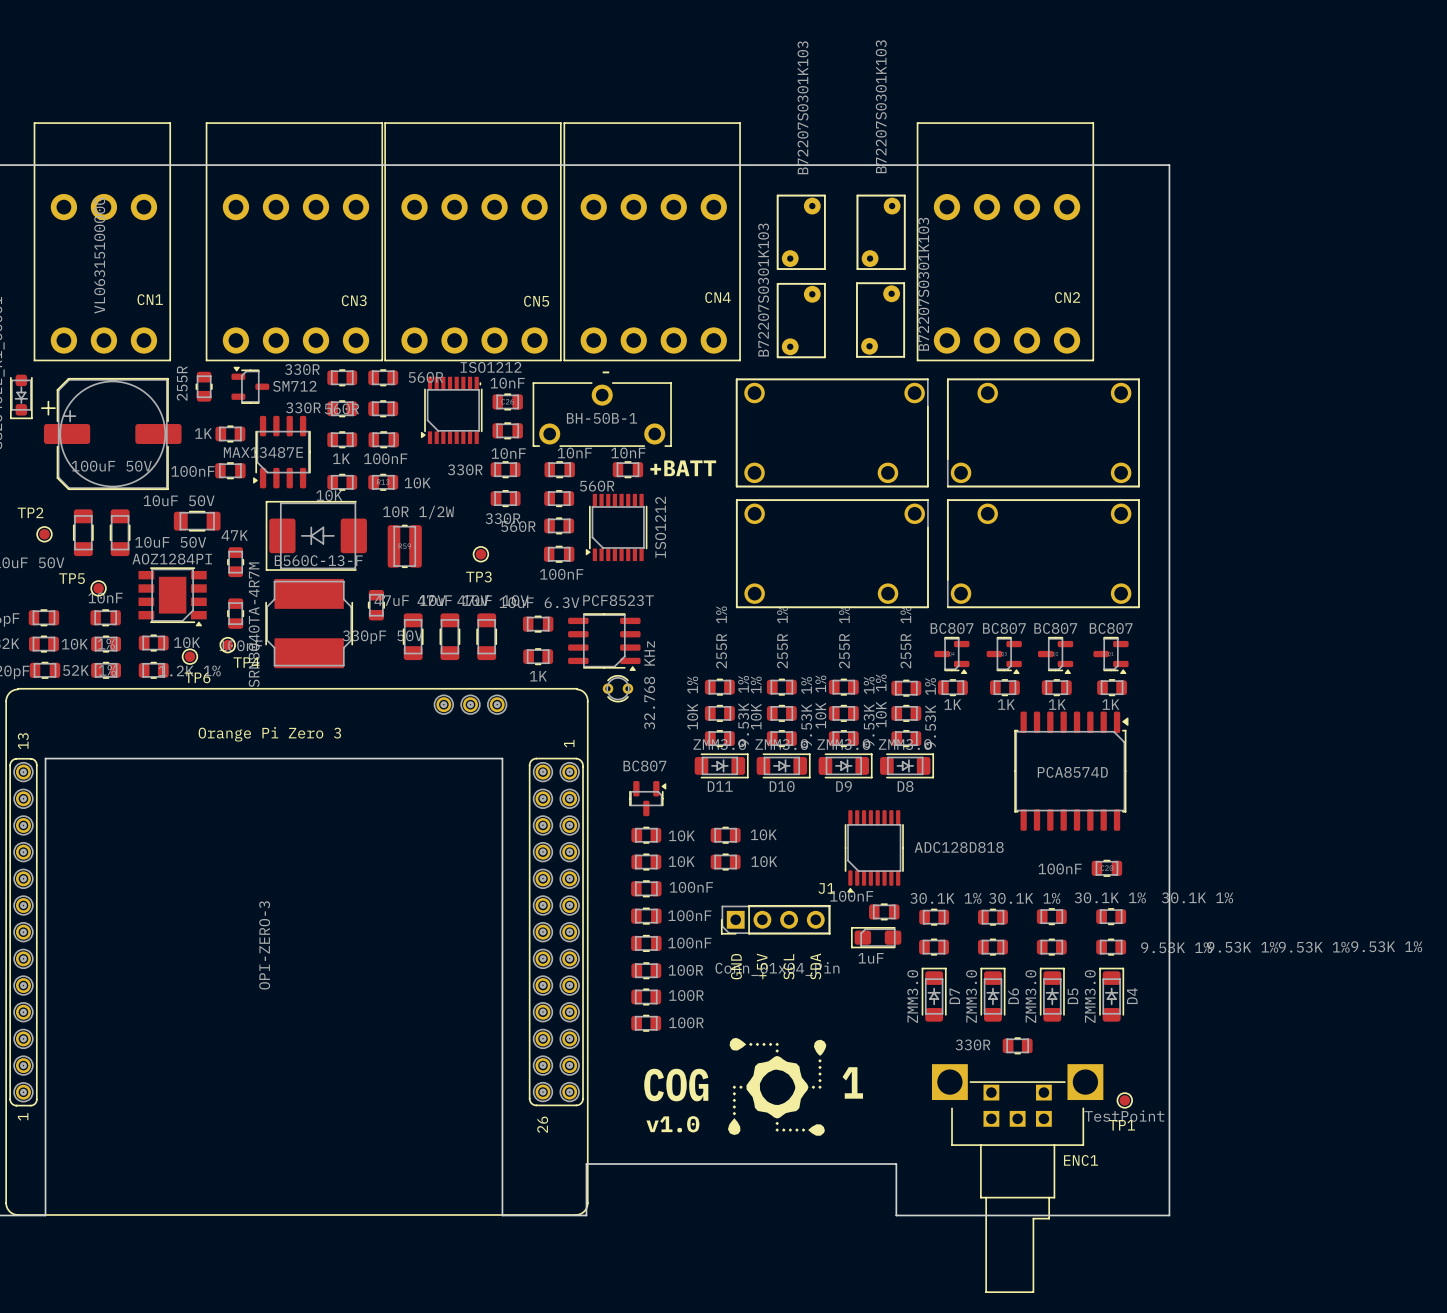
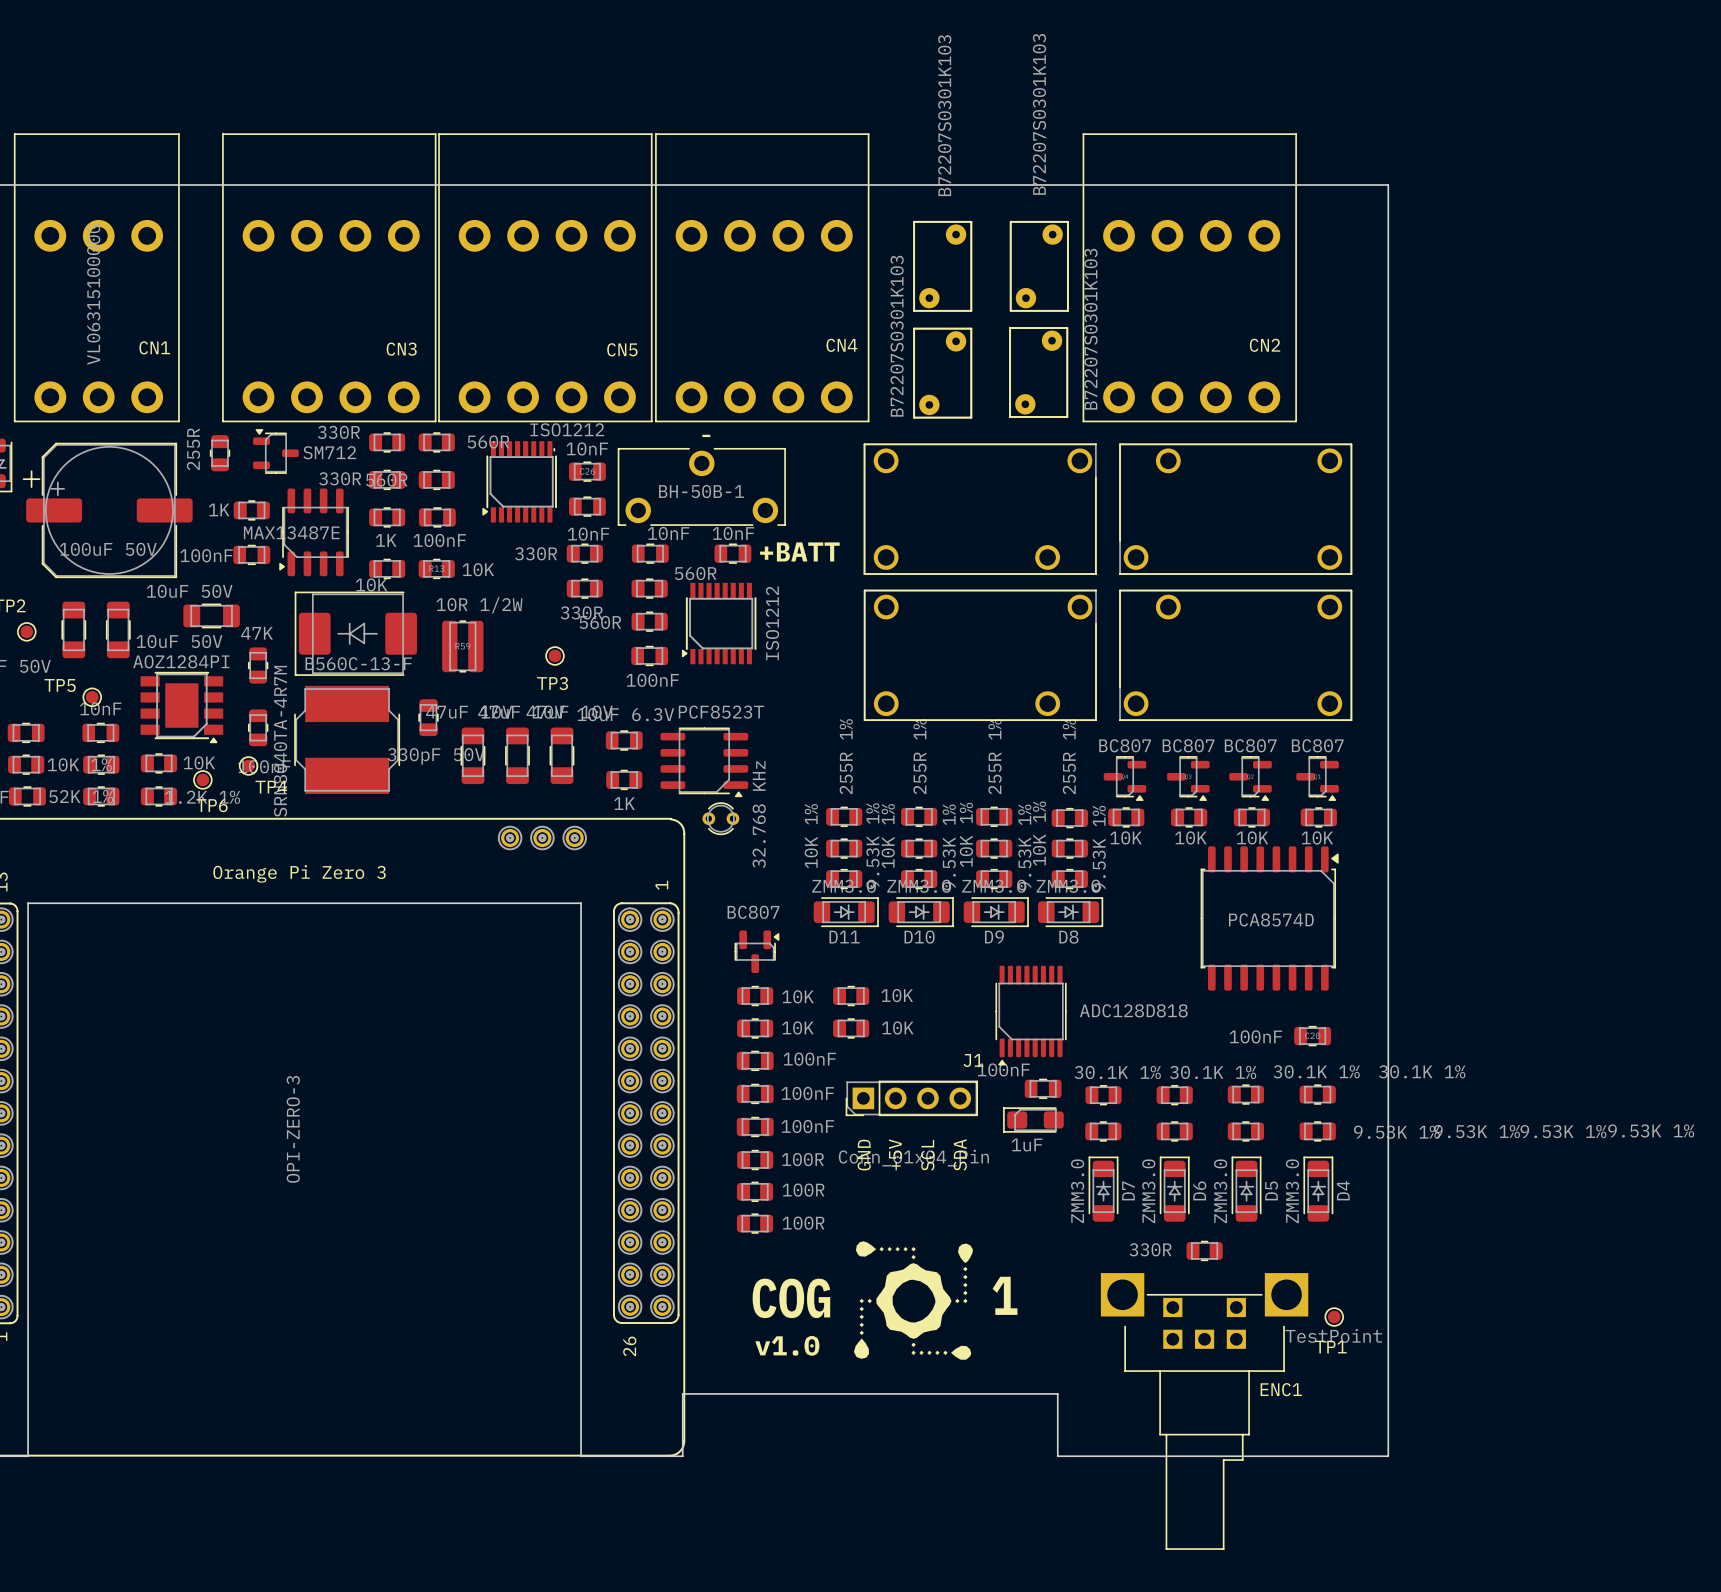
part value: 1K (952, 704) -> 10K (1126, 837)
part value: 1K (1006, 704) -> 10K (1190, 837)
part value: 1K (1057, 704) -> 10K (1252, 837)
part value: 1K (1110, 704) -> 10K (1317, 837)

